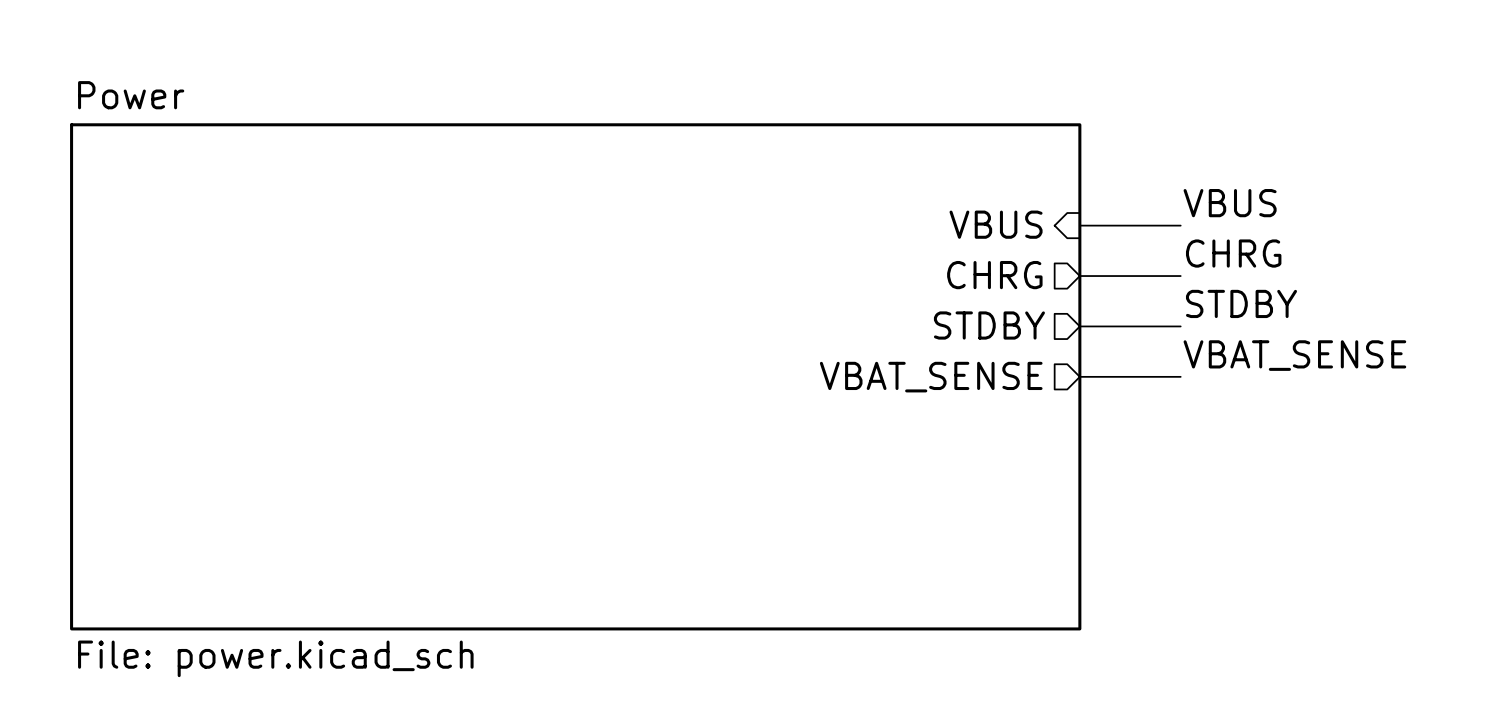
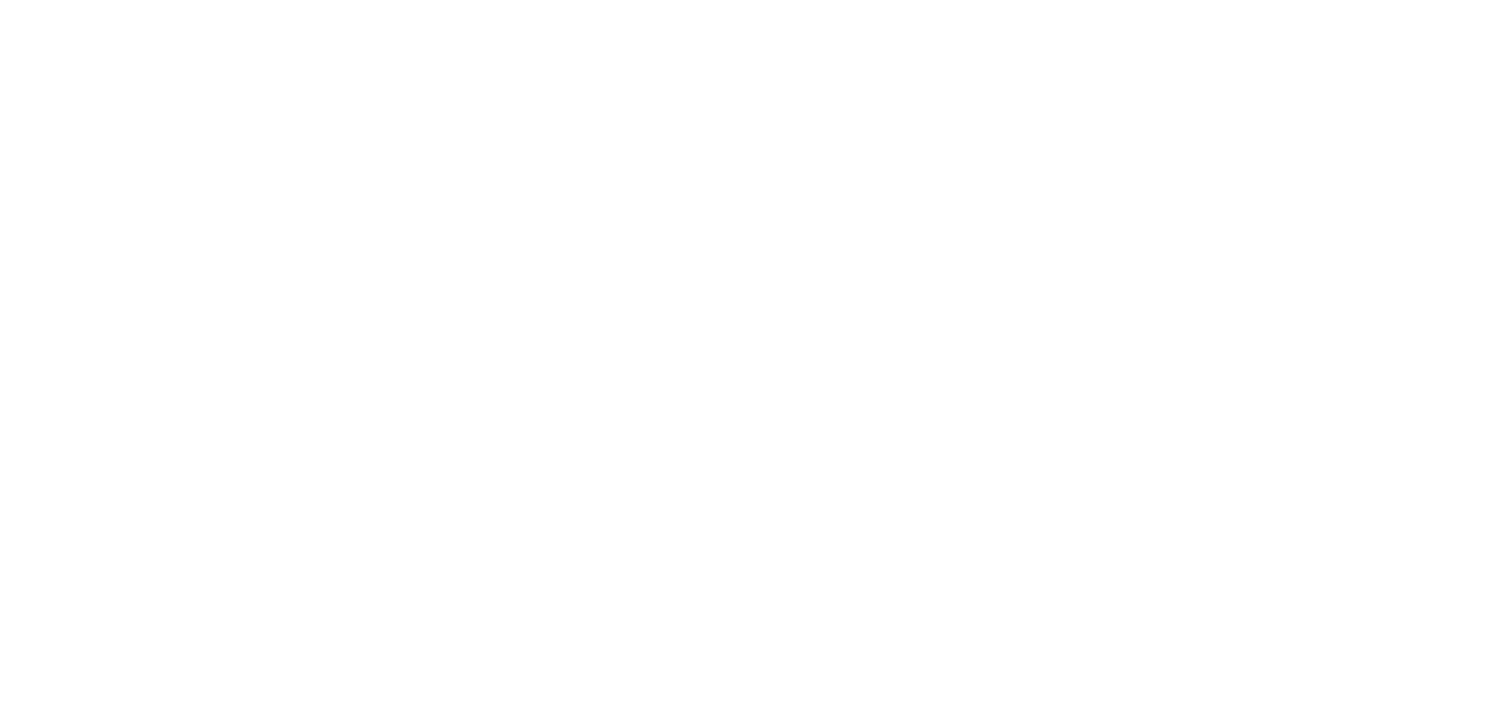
label: VBUS (1230, 203) -> none
sheet pin: VBUS (996, 224) -> none
wire: (1079, 225) (1180, 225) -> none
label: CHRG (1233, 253) -> none
sheet pin: CHRG (994, 275) -> none
wire: (1079, 276) (1180, 276) -> none
label: STDBY (1241, 303) -> none
sheet pin: STDBY (989, 325) -> none
wire: (1079, 326) (1180, 326) -> none
label: VBAT_SENSE (1294, 355) -> none
sheet Power: File: power.kicad_sch (575, 376) -> none
wire: (1079, 376) (1180, 376) -> none
sheet pin: VBAT_SENSE (931, 377) -> none

